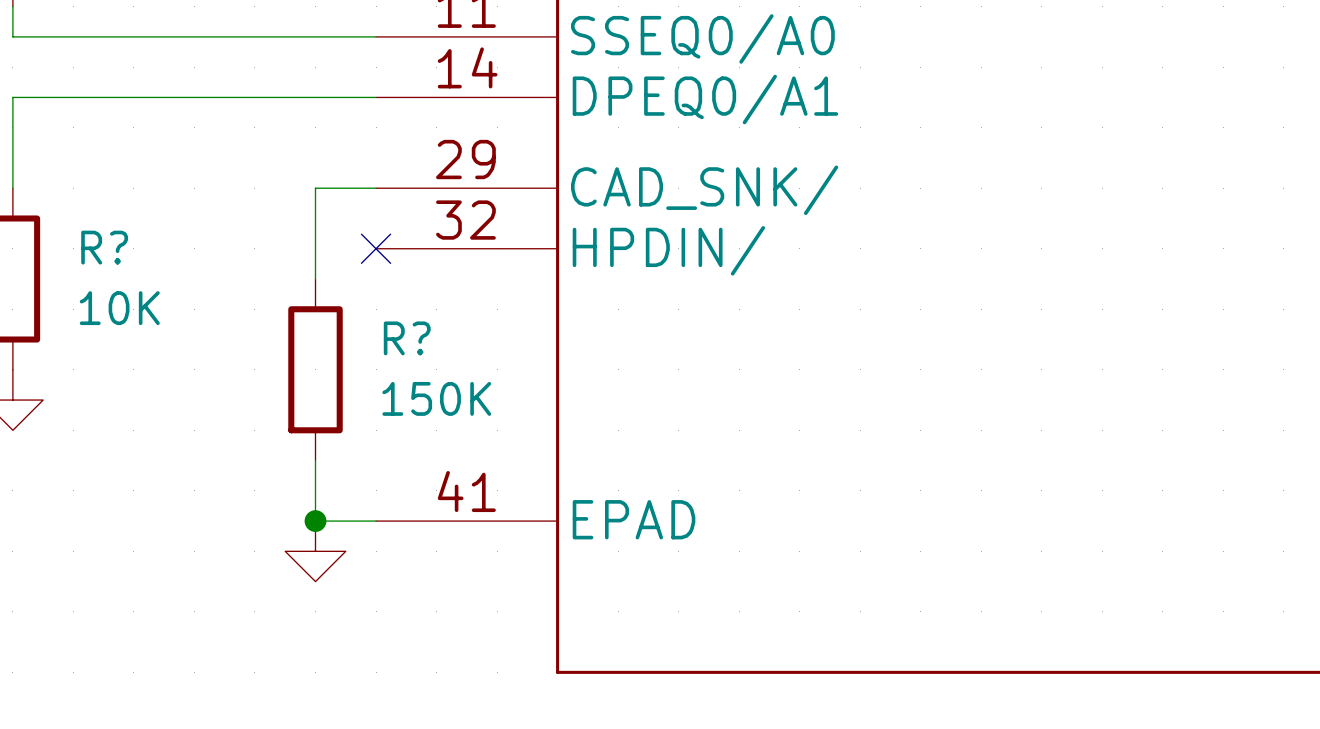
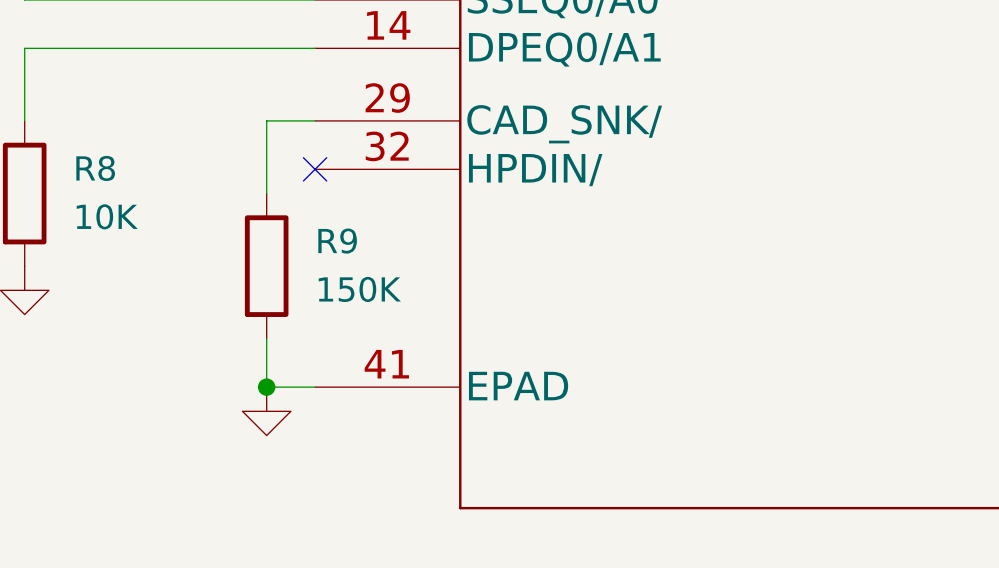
R? name: R? (104, 247) -> R8 (95, 168)
R? name: R? (407, 338) -> R9 (337, 241)

